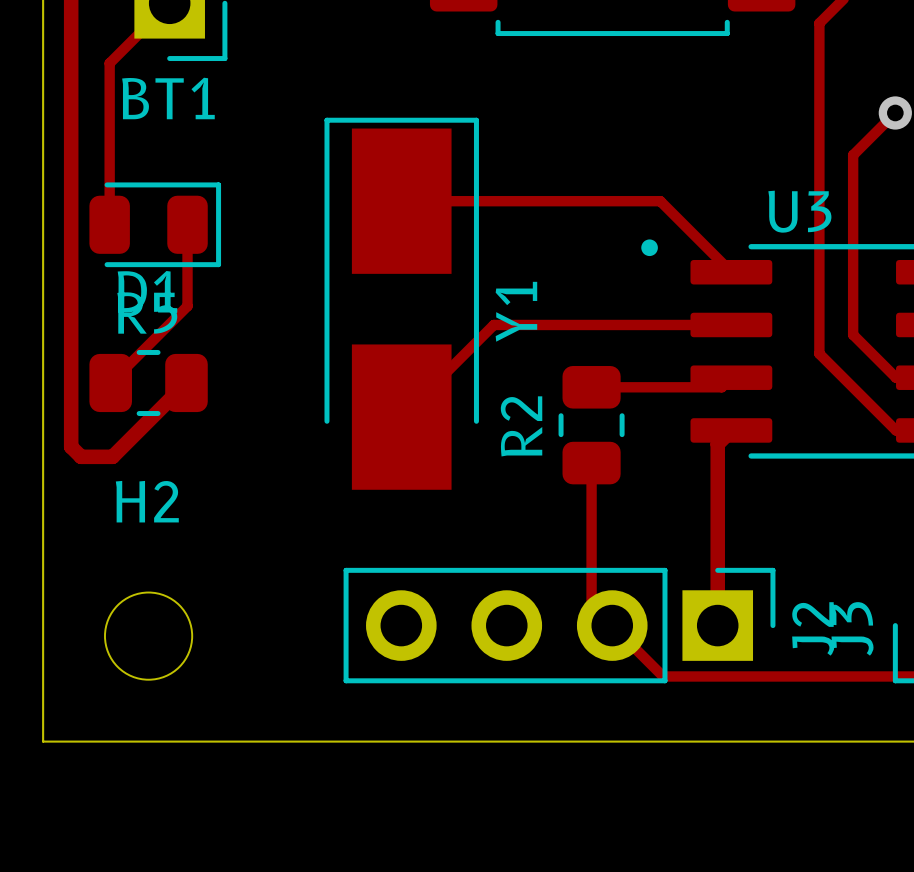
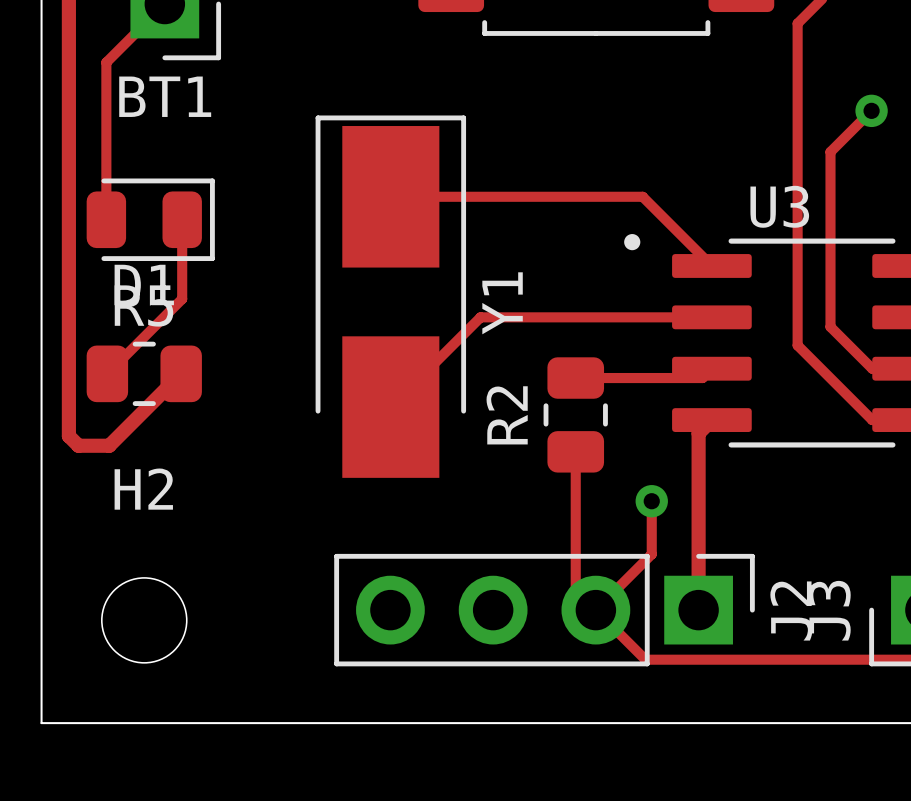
track: none -> (651, 501) (651, 554) (595, 610)
via: none -> (651, 501)

